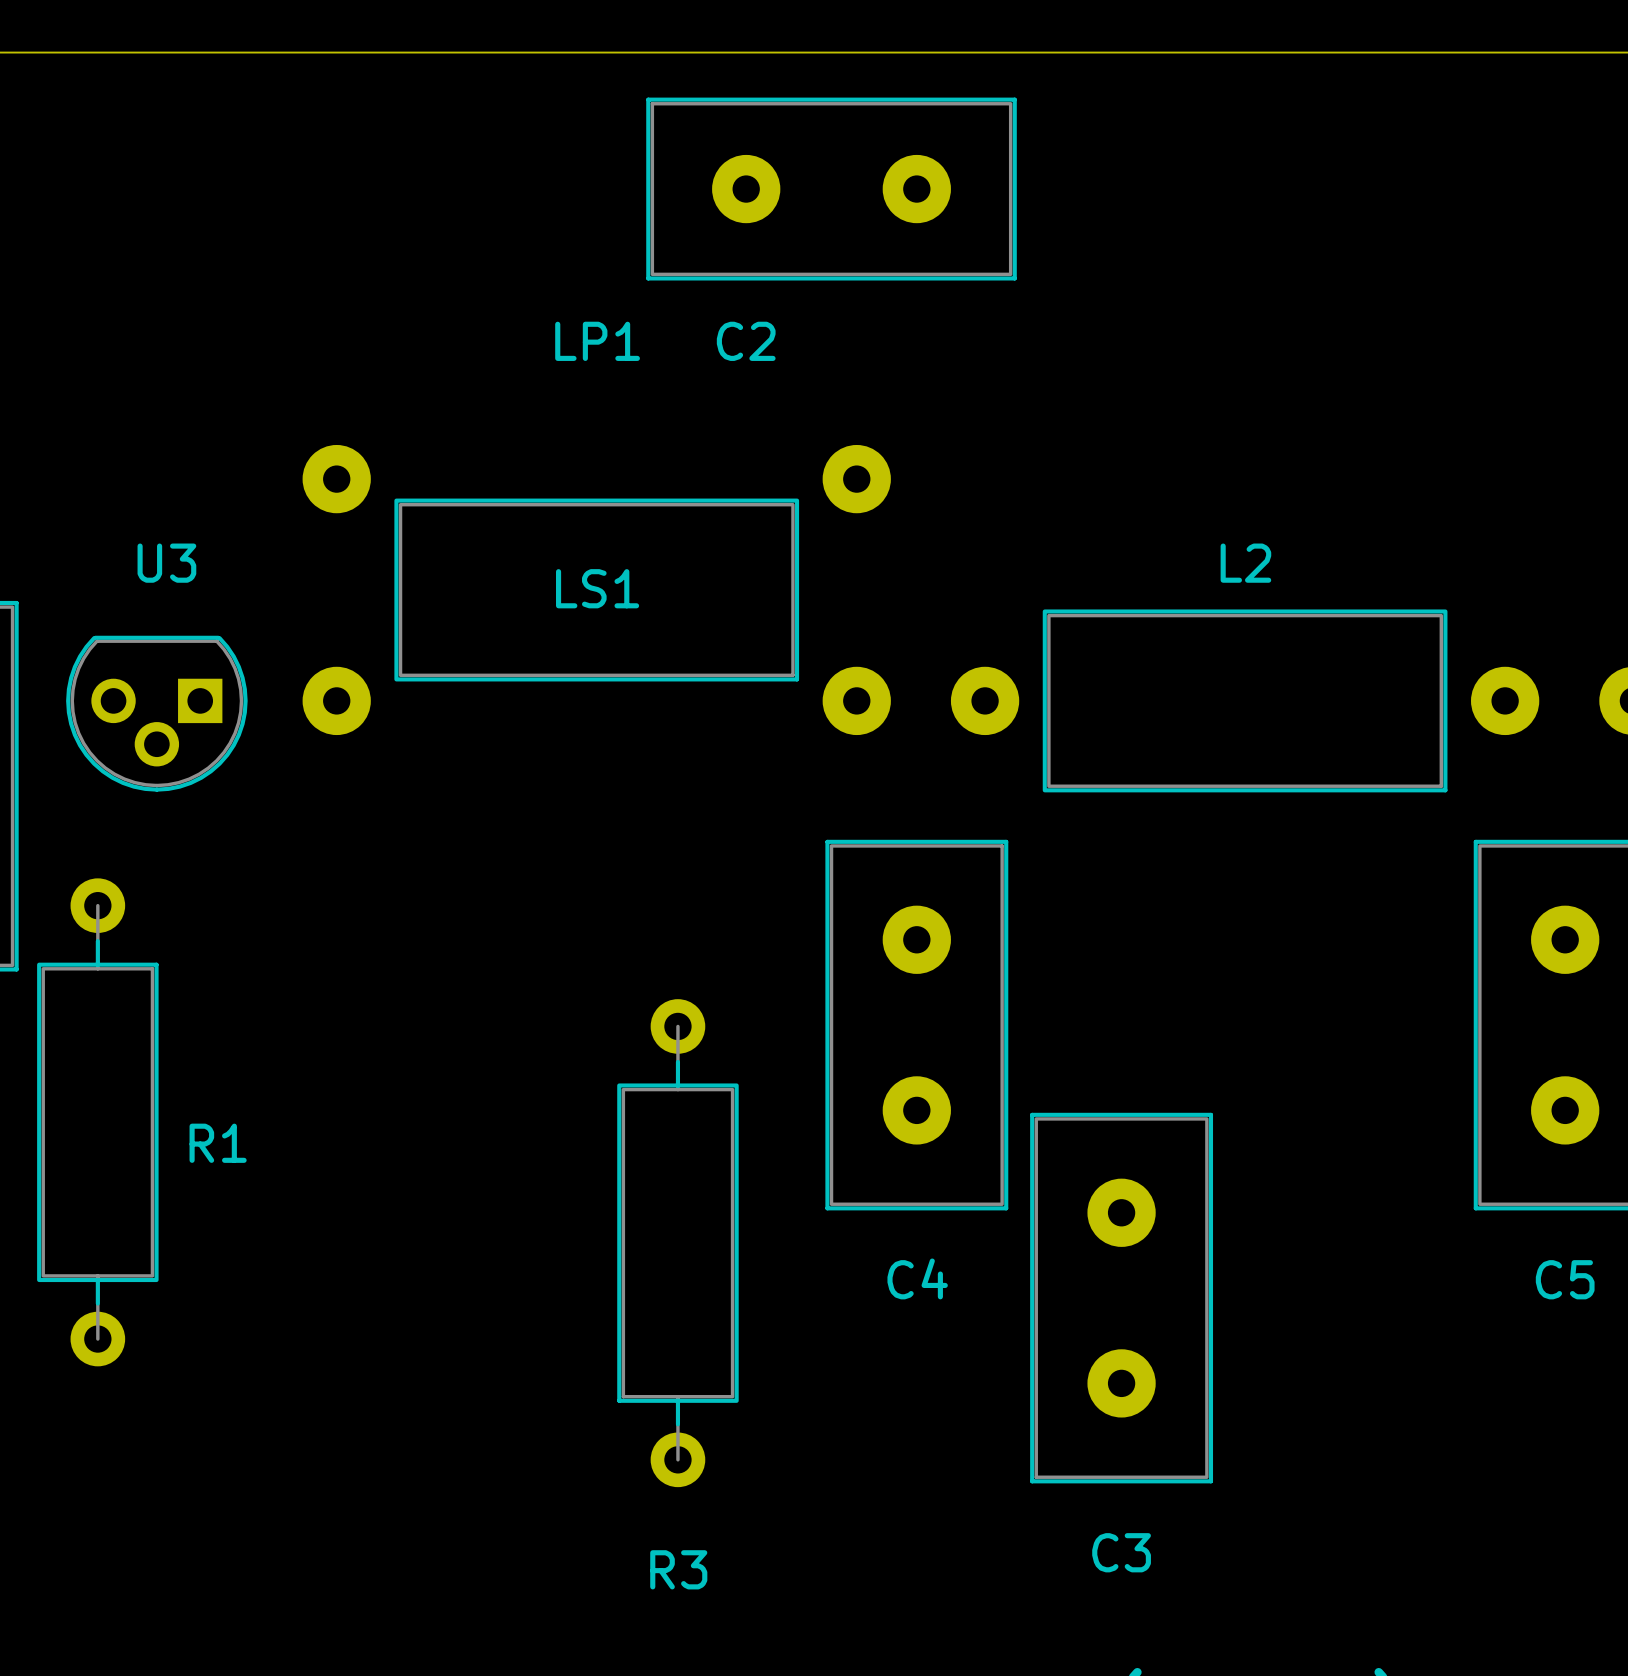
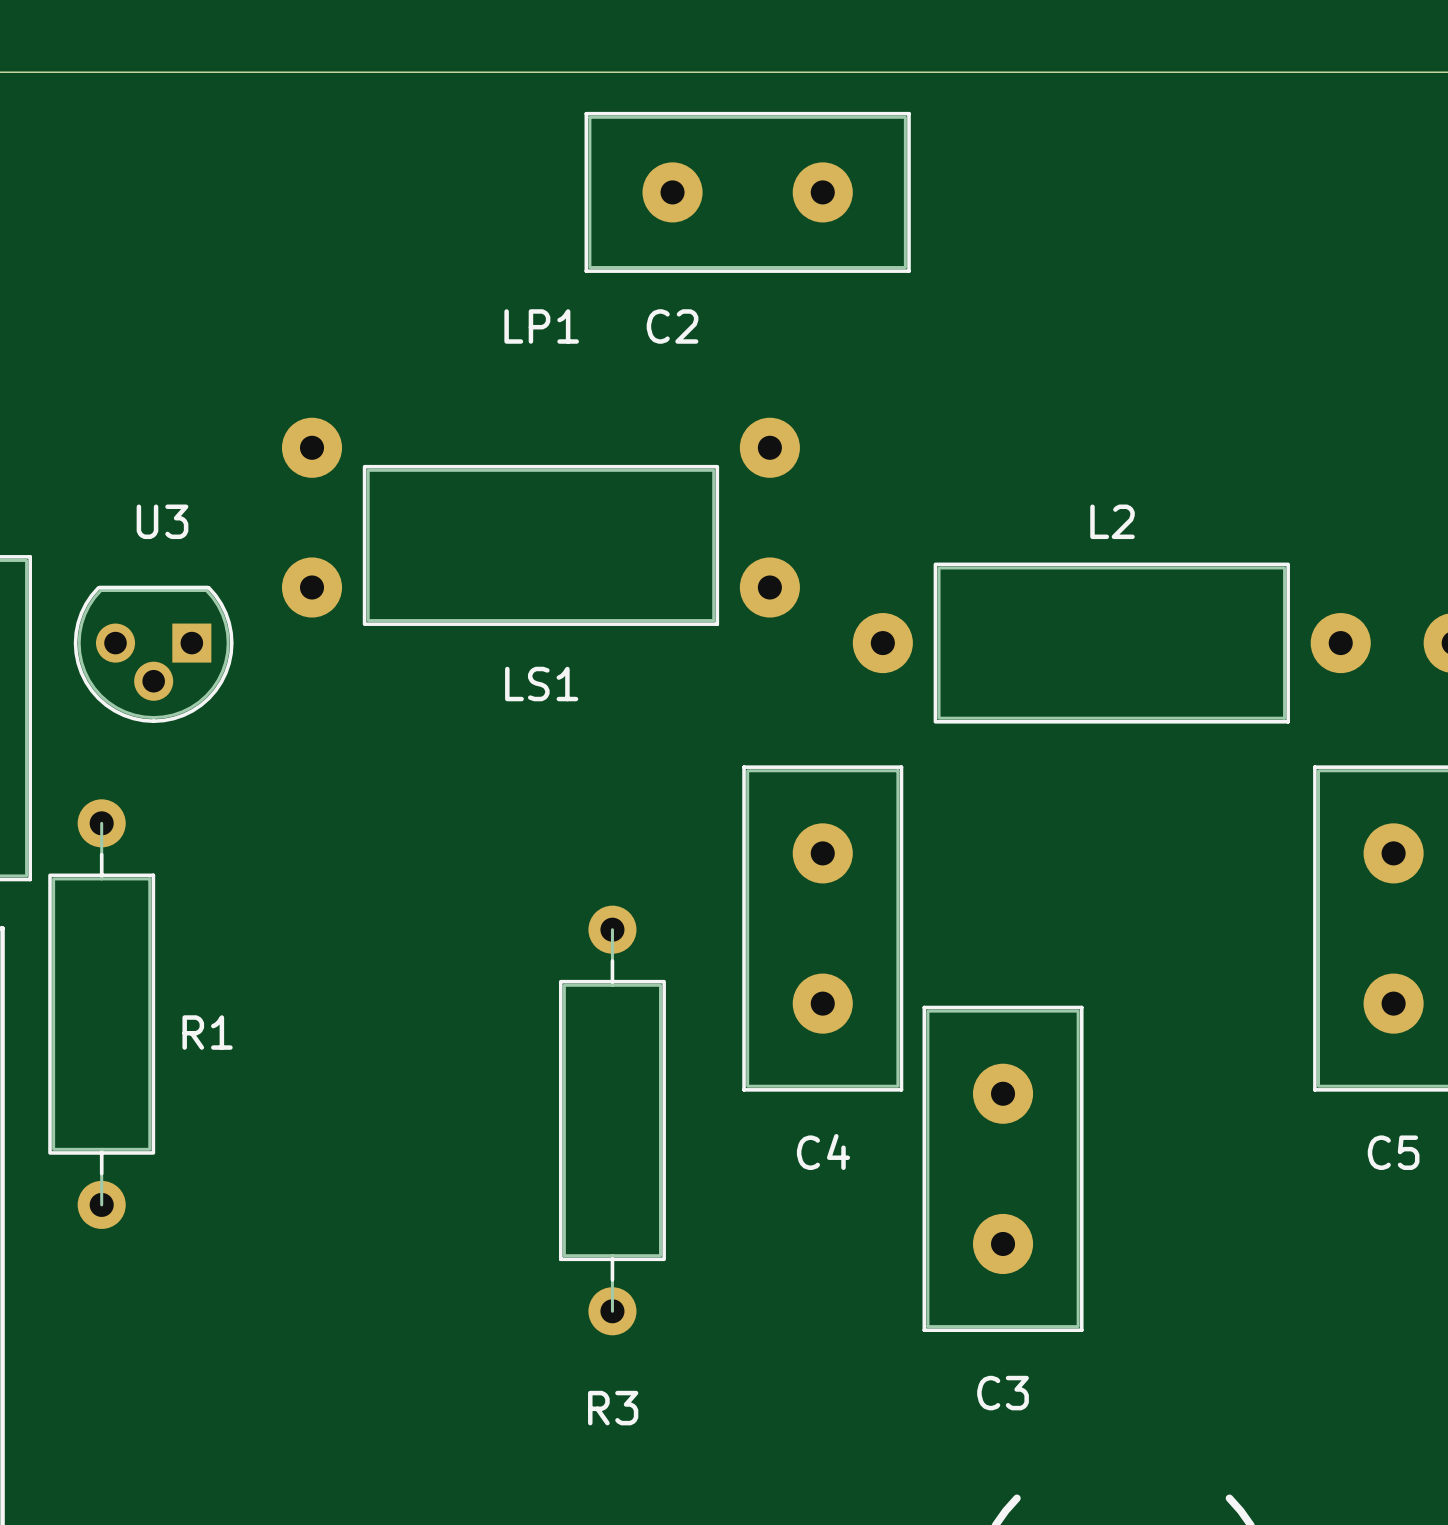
LS1 name position: LS1 (597, 588) -> LS1 (541, 684)
LS1 position: (596, 700) -> (540, 587)

